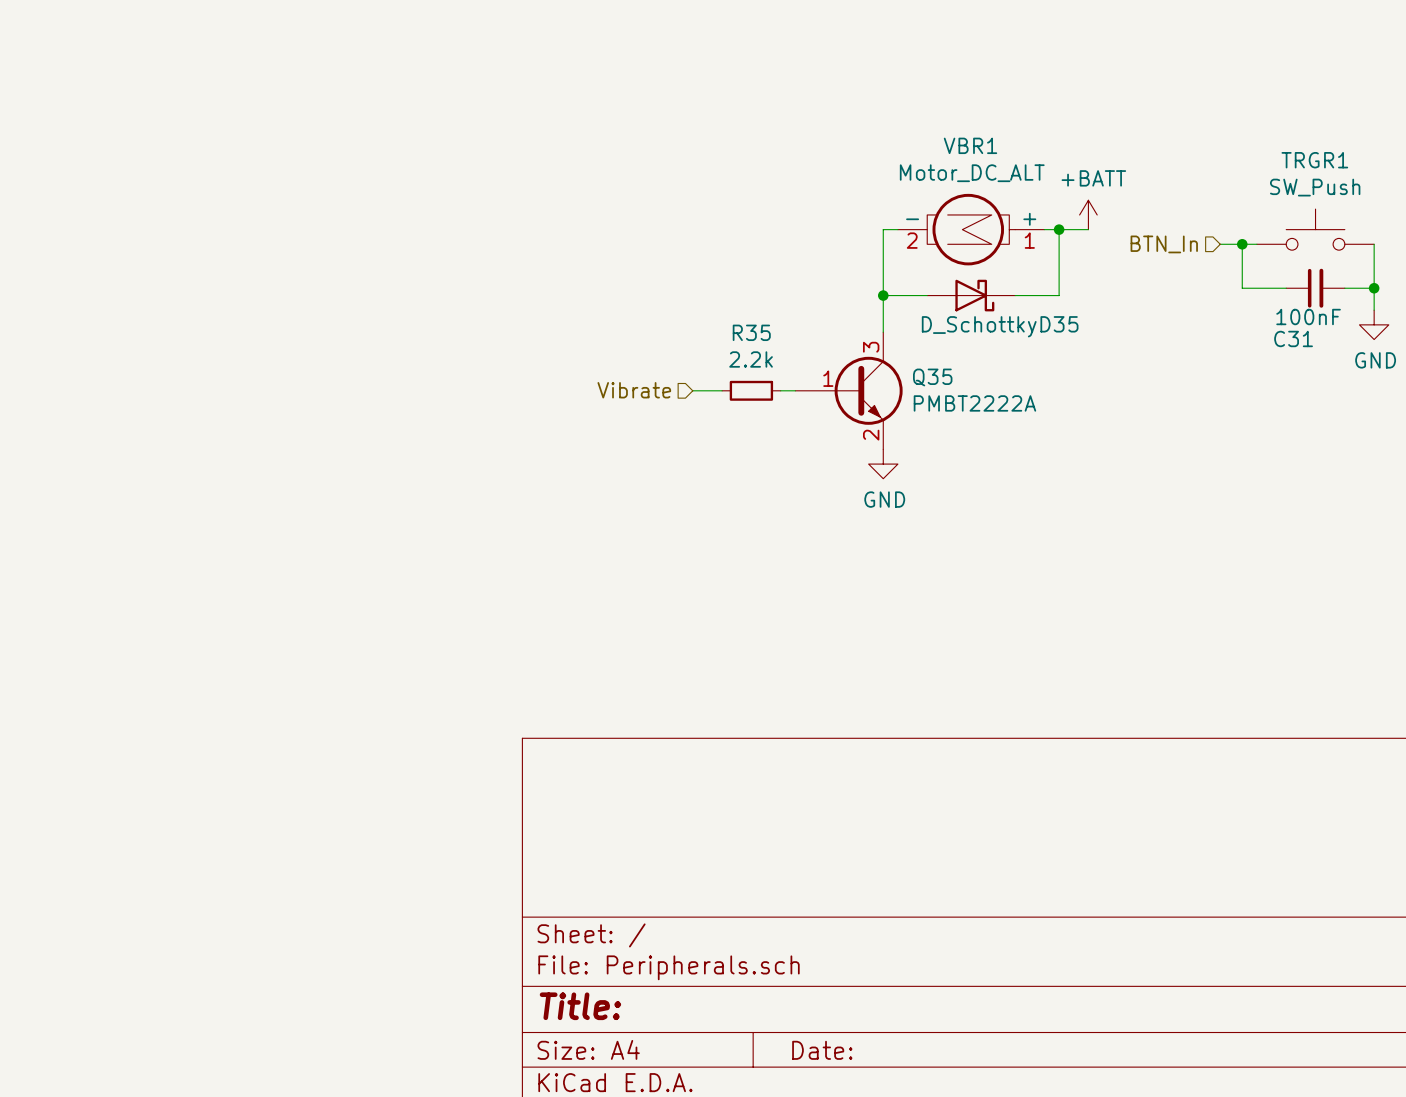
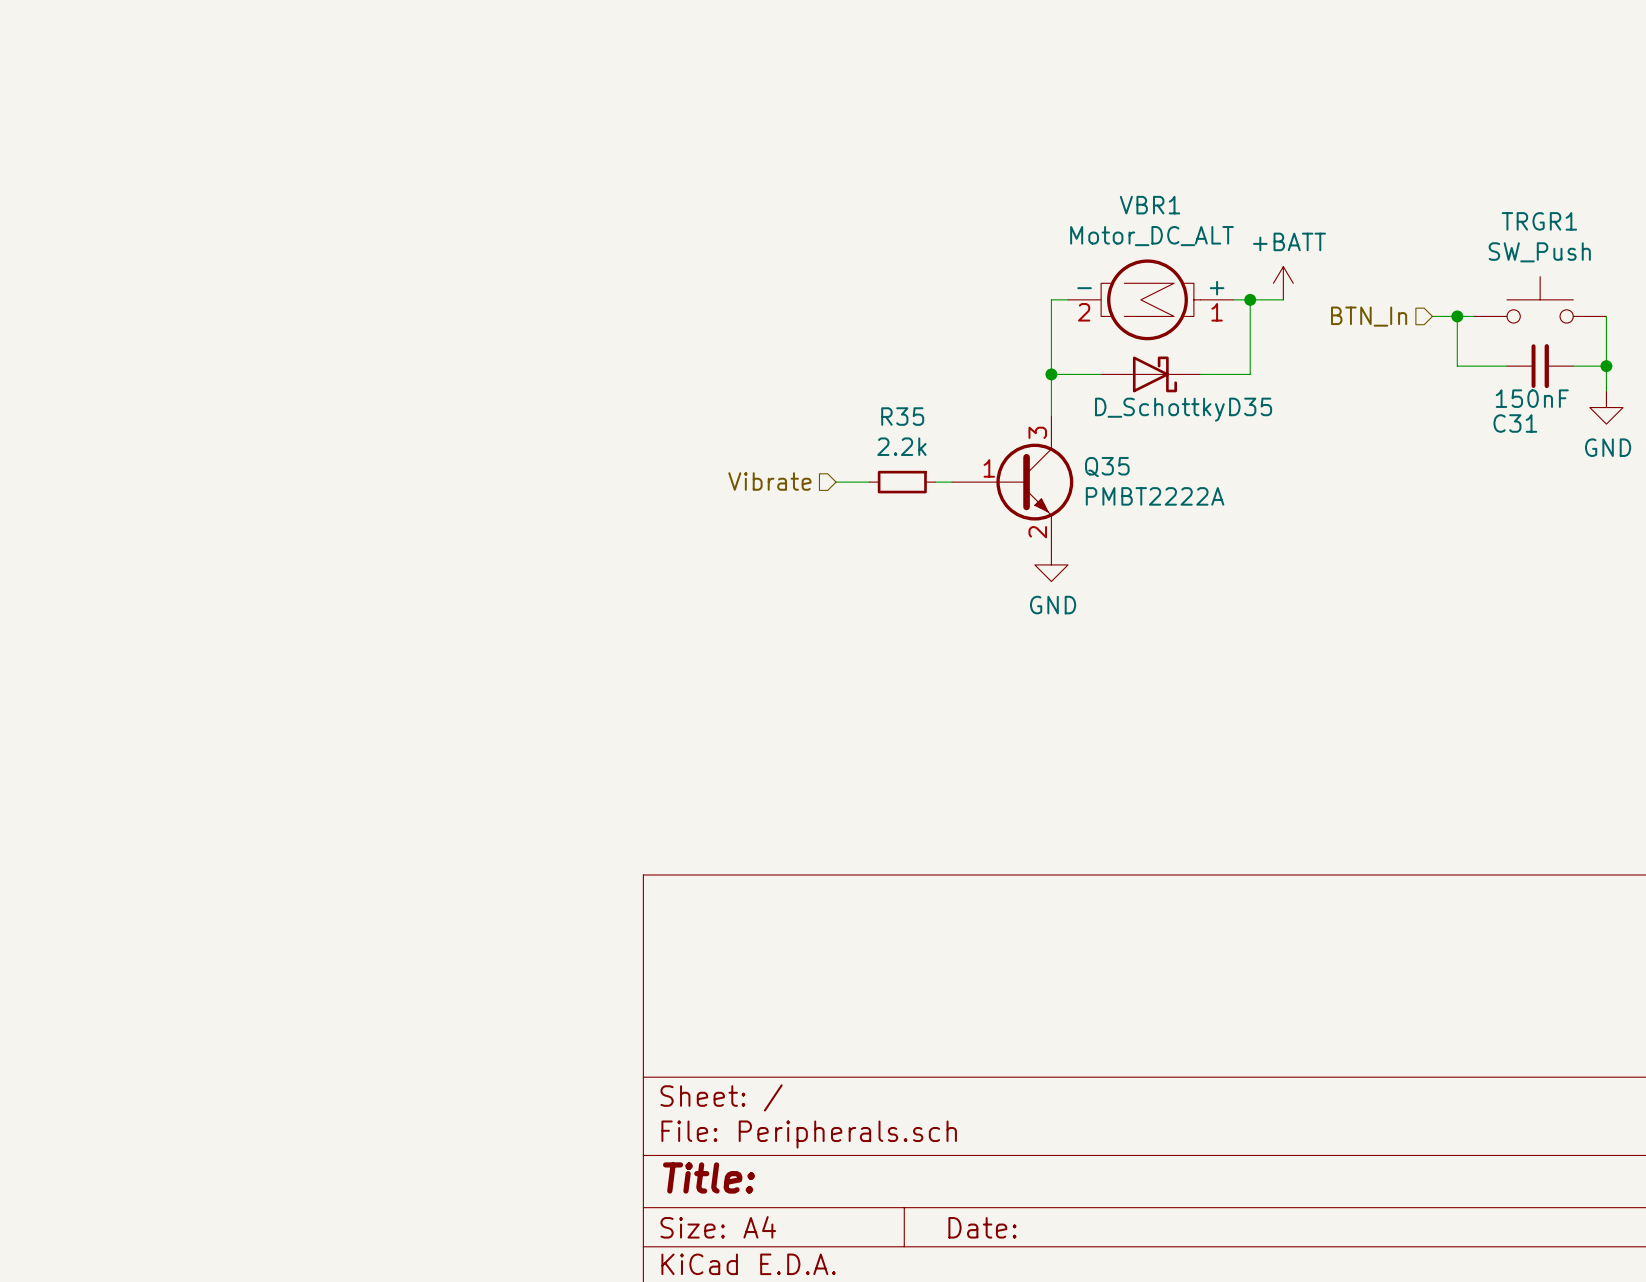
C31 value: 100nF (1308, 317) -> 150nF (1532, 398)

